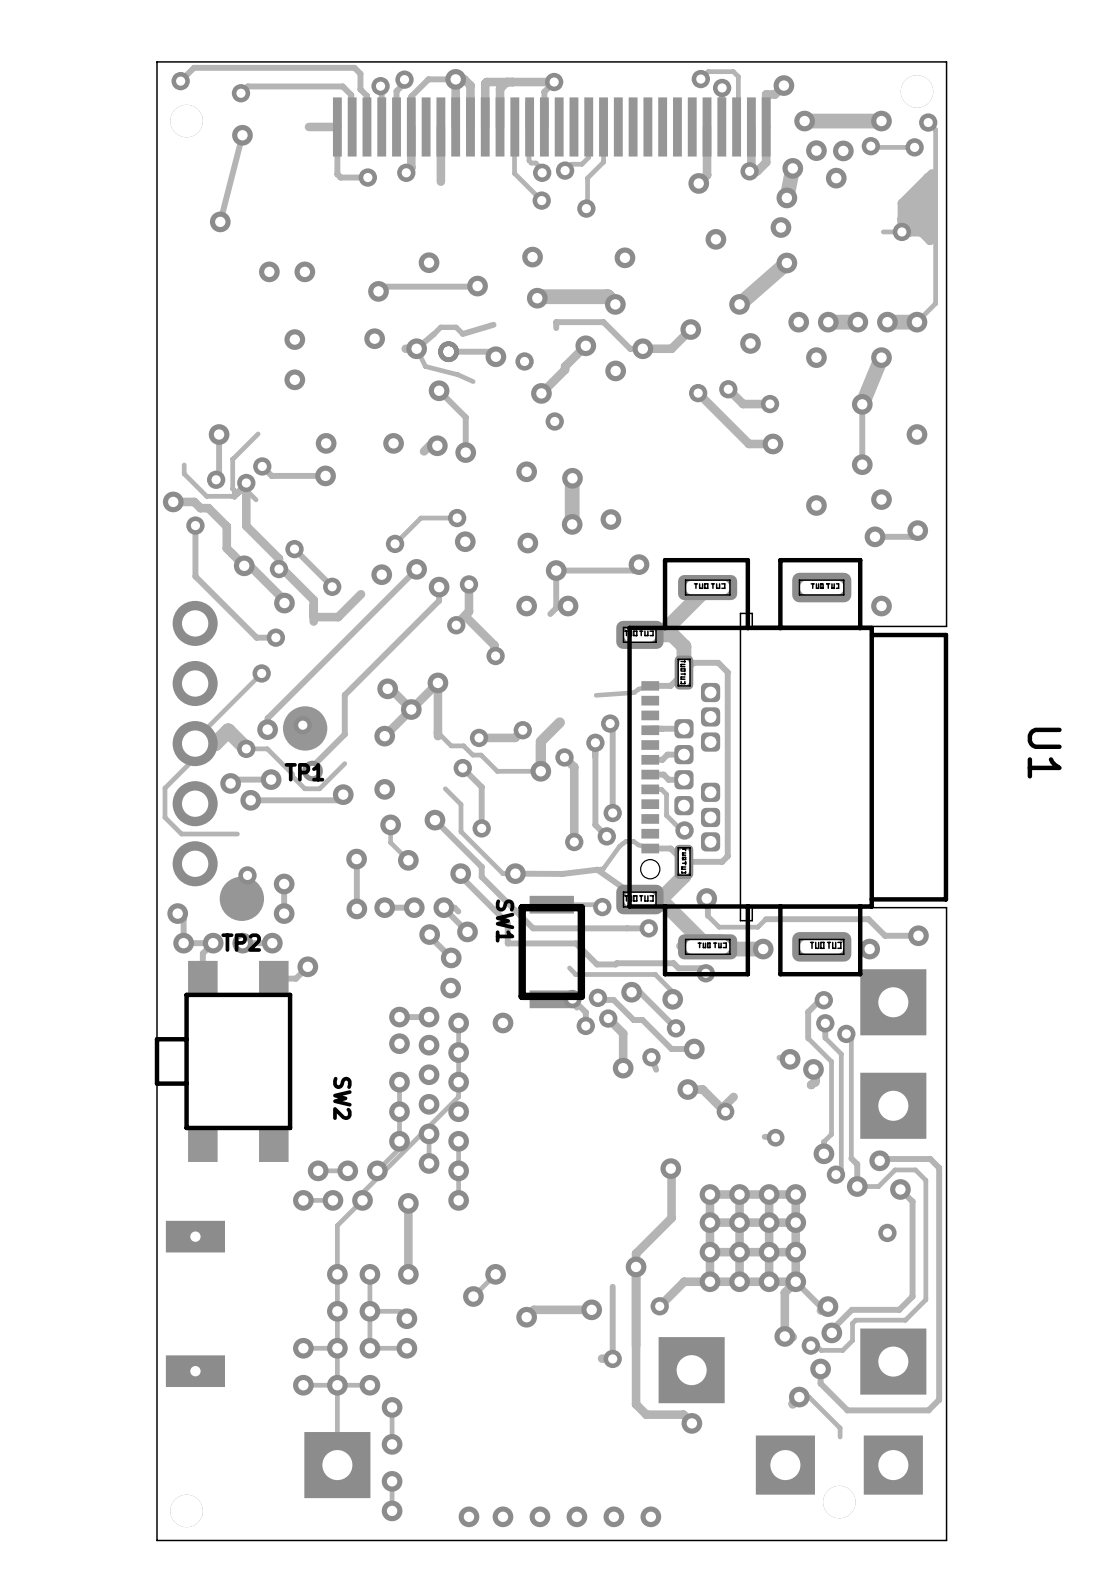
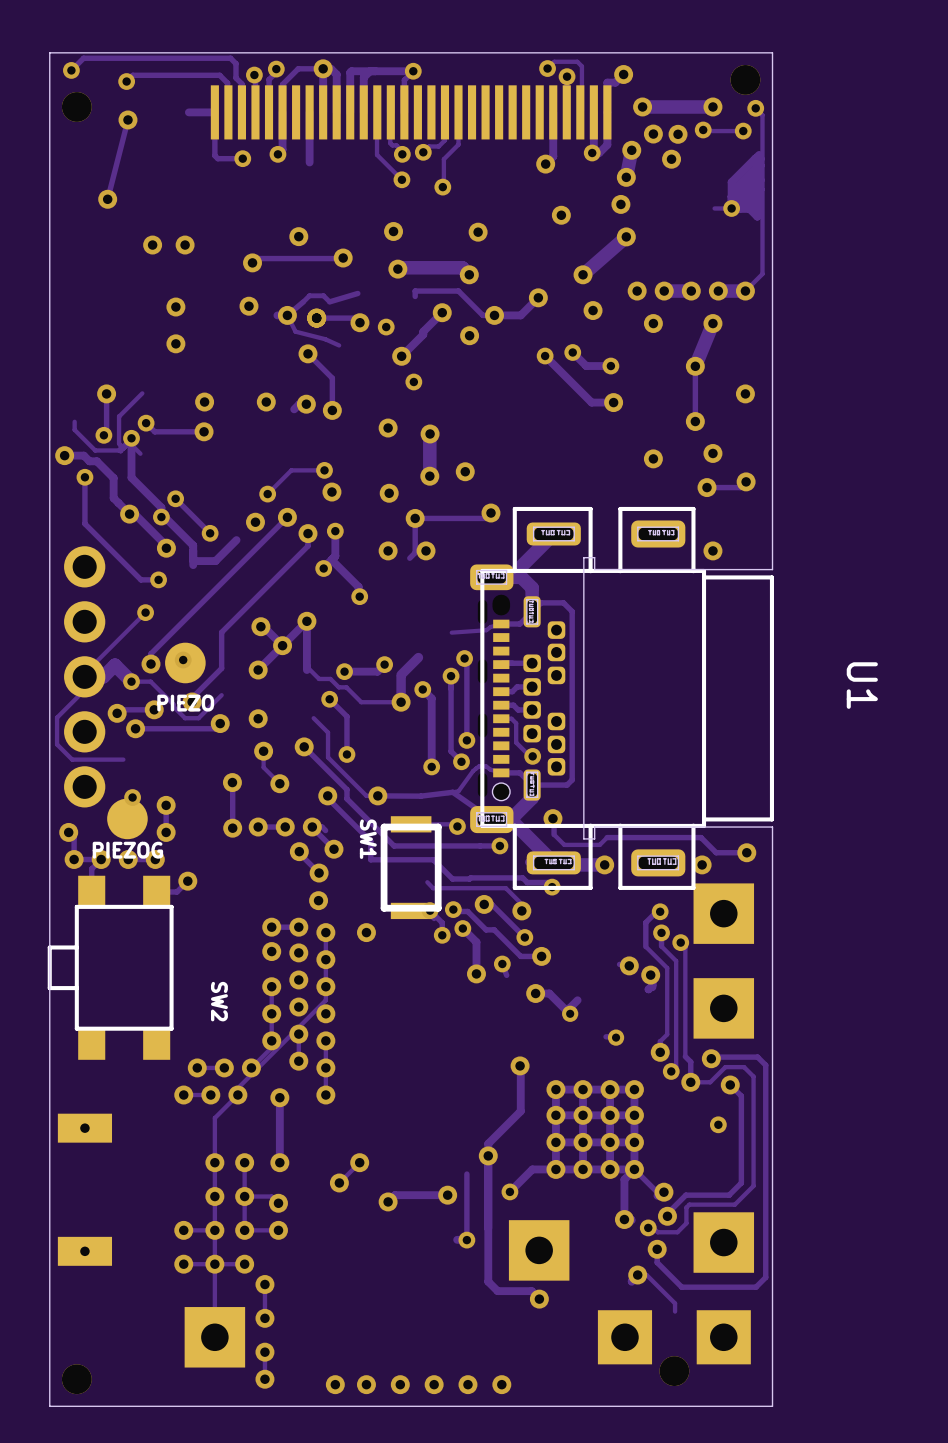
TP1 name: TP1 (304, 772) -> PIEZO (185, 703)
TP2 name: TP2 (241, 942) -> PIEZOG (127, 850)

